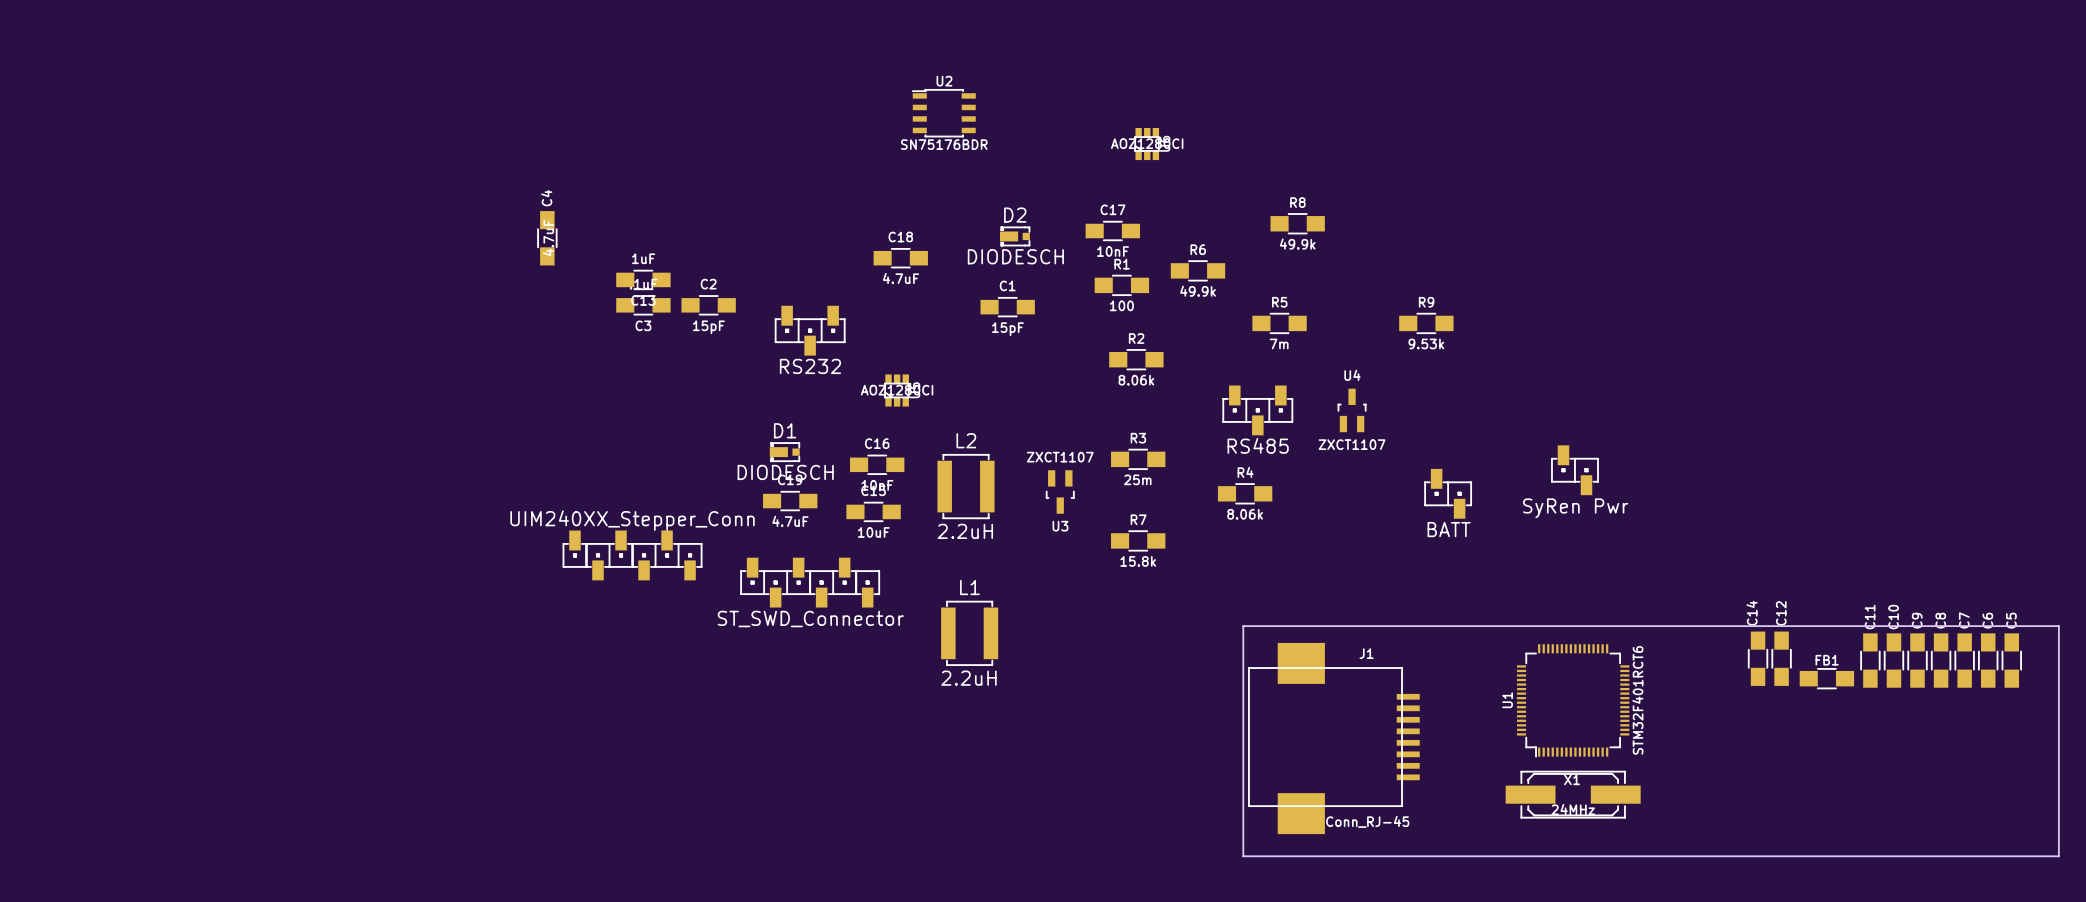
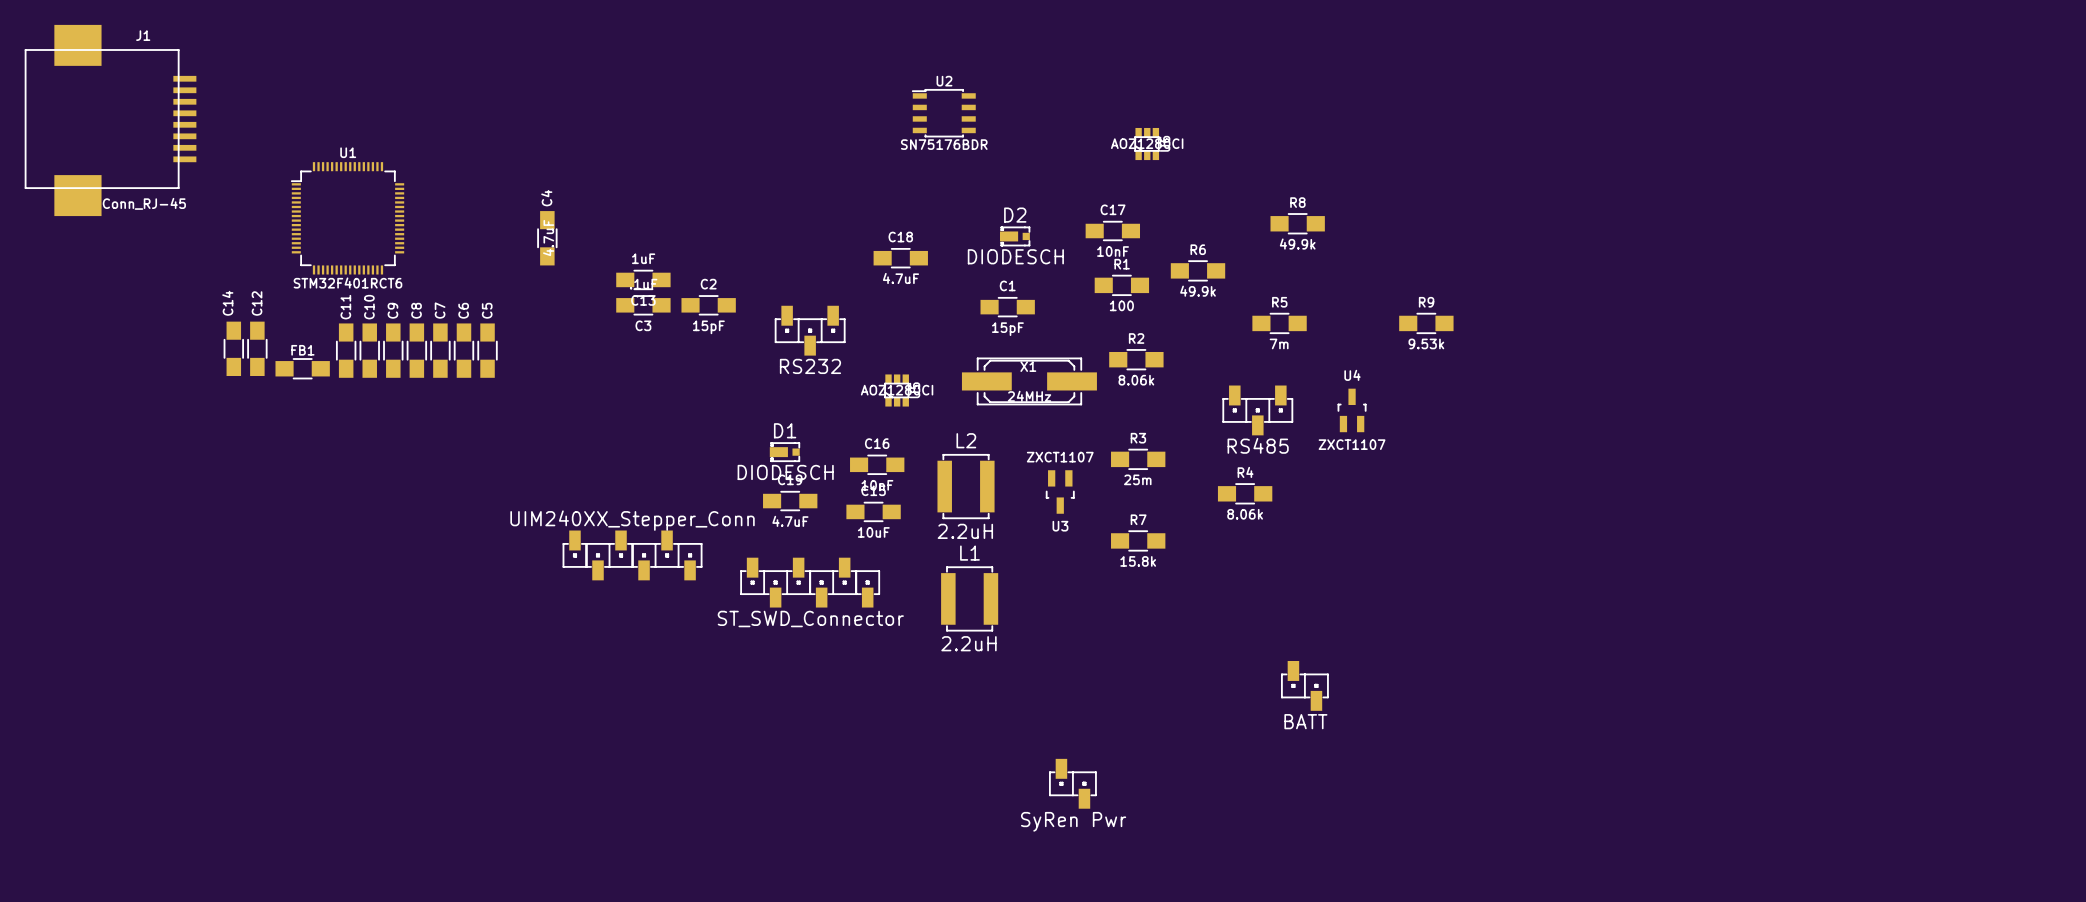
part: SyRen Pwr (1574, 470) -> none
part: BATT (1448, 493) -> none
board edge: (1243, 626) (2058, 626) (2058, 856) (1243, 856) (1243, 626) -> none
L1 position: (969, 633) -> (969, 598)
C14 position: (1758, 658) -> (233, 348)
C12 position: (1781, 658) -> (257, 348)
C11 position: (1870, 660) -> (346, 350)
C10 position: (1893, 660) -> (369, 350)
C9 position: (1917, 660) -> (393, 350)
C8 position: (1941, 660) -> (416, 350)
C7 position: (1964, 660) -> (440, 350)
C6 position: (1988, 660) -> (463, 350)
C5 position: (2011, 660) -> (487, 350)
FB1 position: (1826, 678) -> (302, 368)
part: none -> BATT (1304, 685)
U1 rotation: 0° (1573, 700) -> 90° clockwise (347, 218)
U1 position: (1573, 700) -> (347, 218)
J1 position: (1334, 738) -> (110, 120)
part: none -> SyRen Pwr (1072, 783)
X1 position: (1573, 794) -> (1029, 381)

